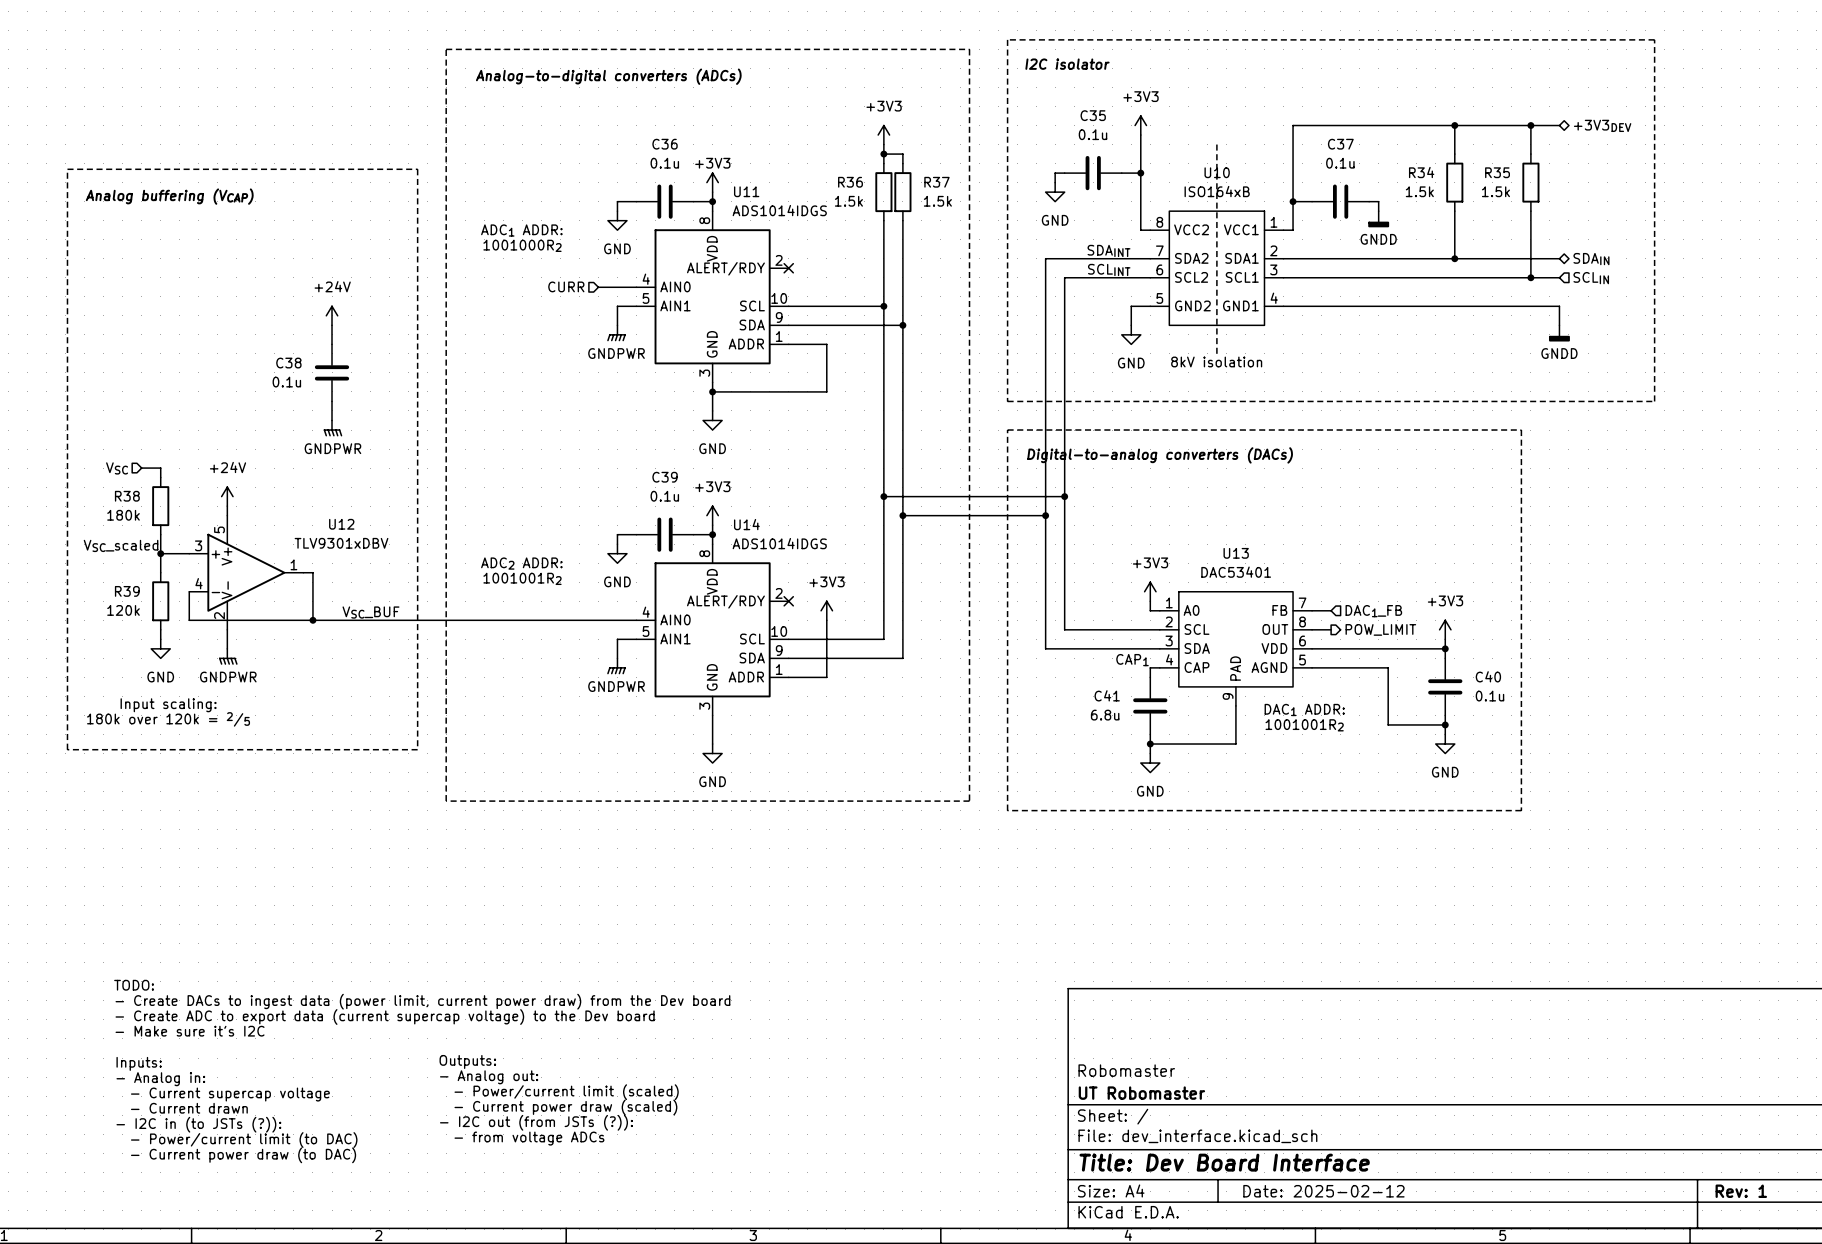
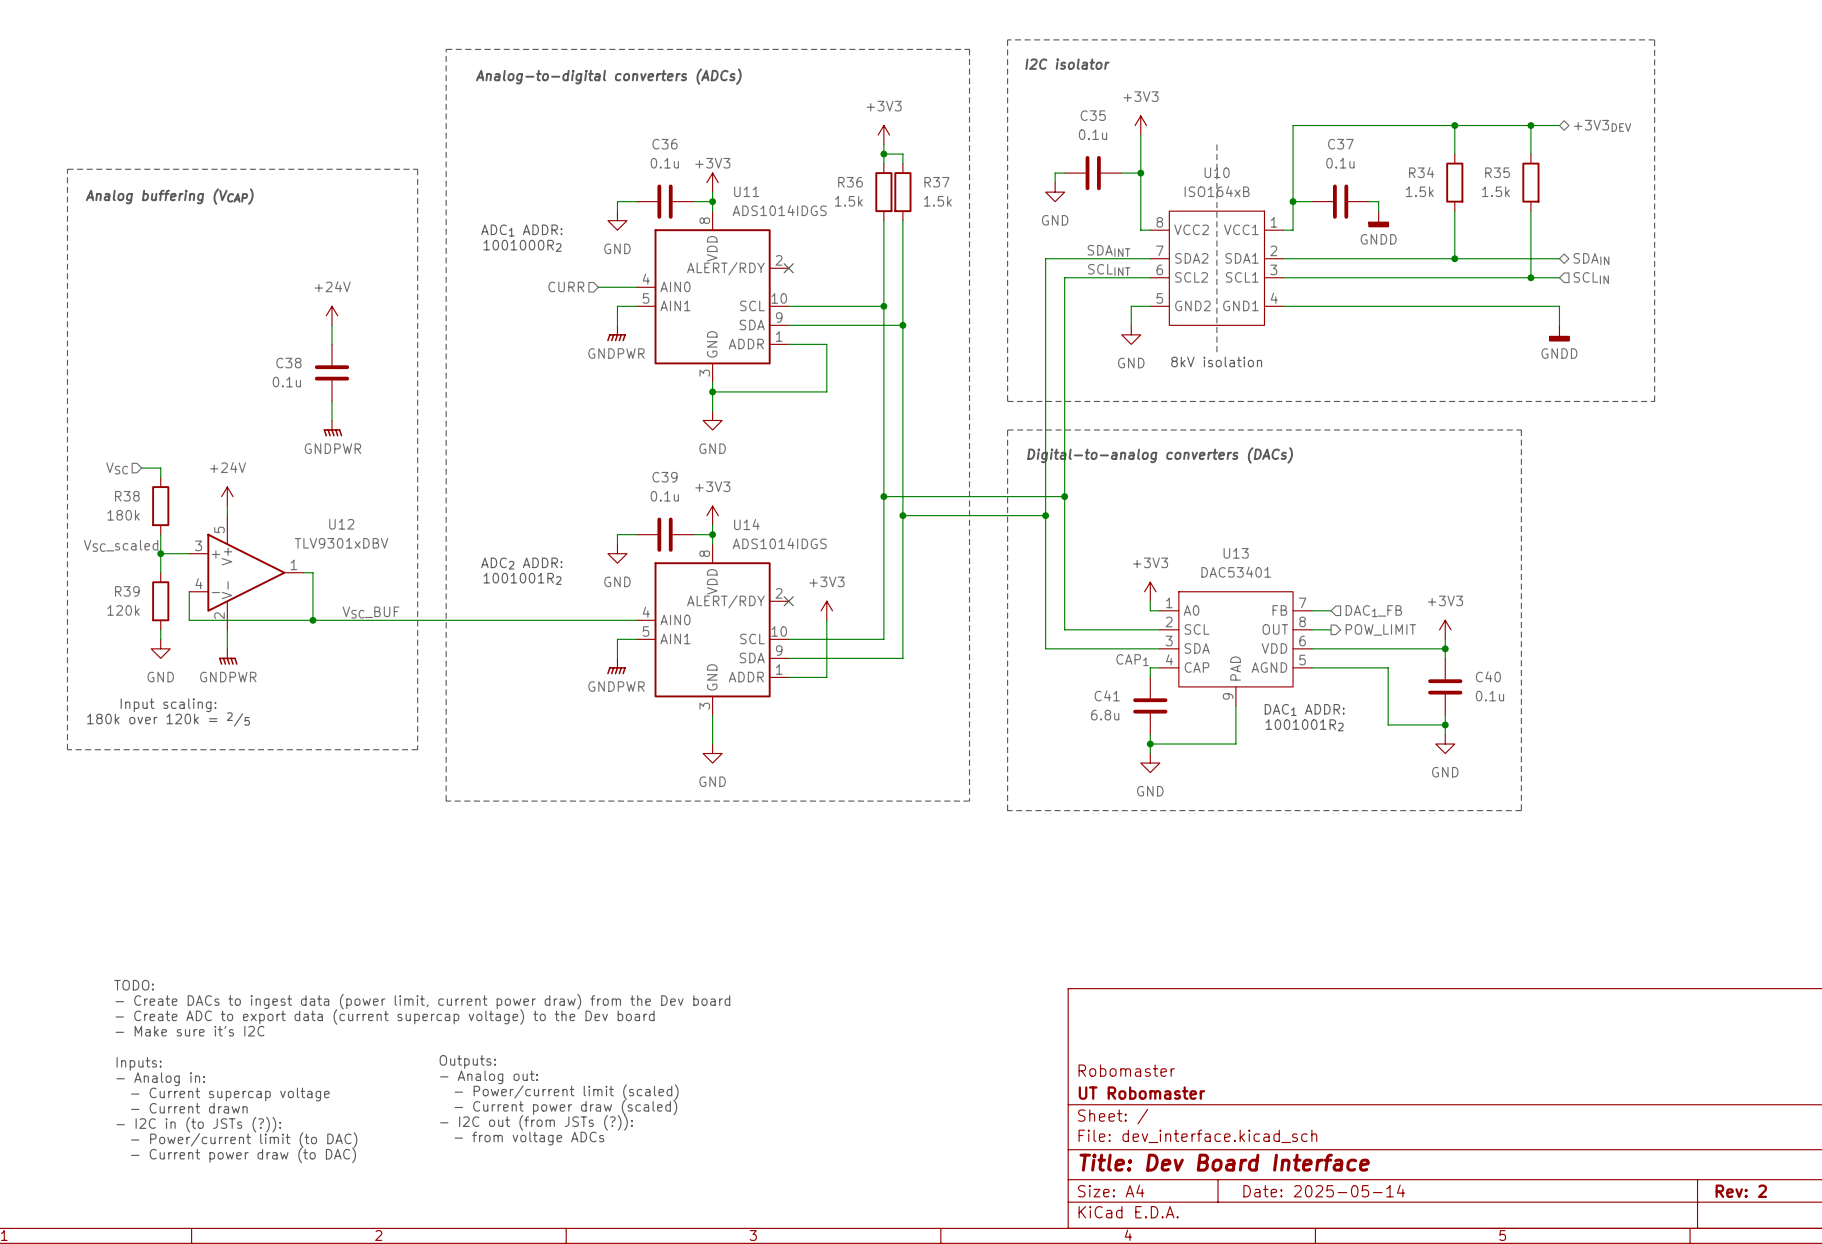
title block: Date: 2025-02-12 (1323, 1191) -> Date: 2025-05-14 (1324, 1190)
title block: Rev: 1 (1741, 1191) -> Rev: 2 (1741, 1191)

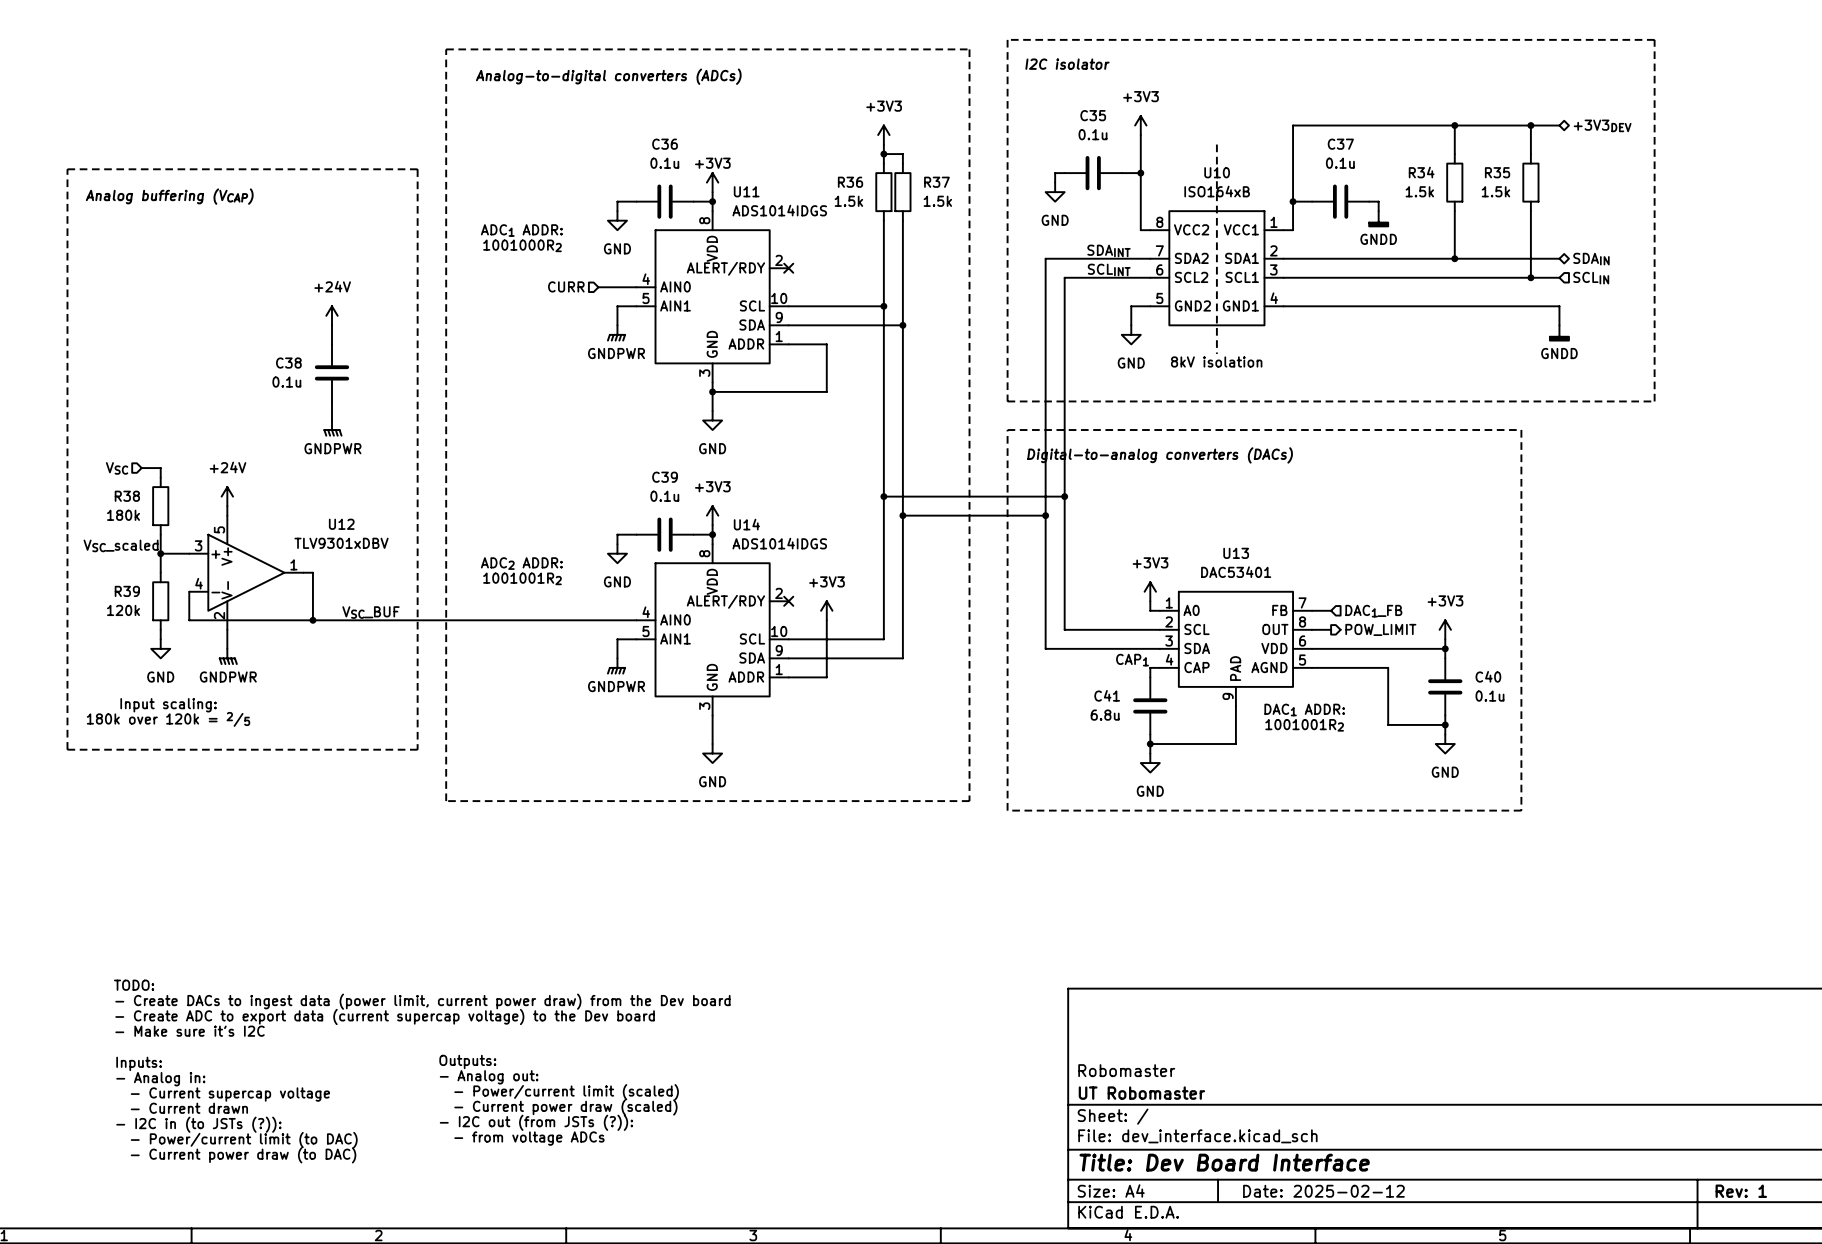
title block: Date: 2025-05-14 (1324, 1190) -> Date: 2025-02-12 (1323, 1191)
title block: Rev: 2 (1741, 1191) -> Rev: 1 (1741, 1191)

